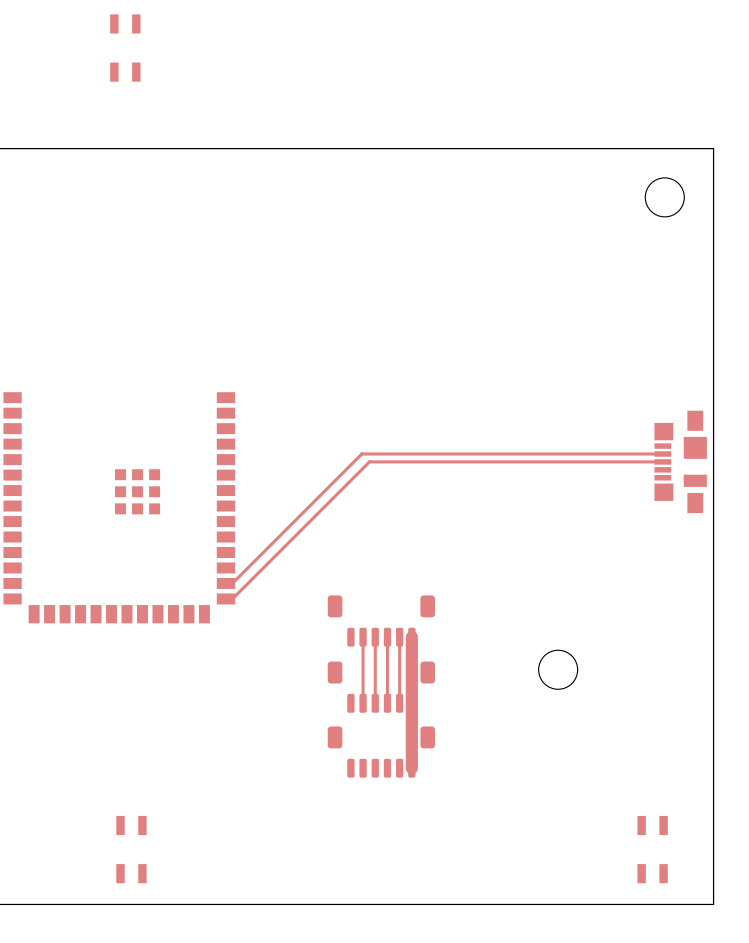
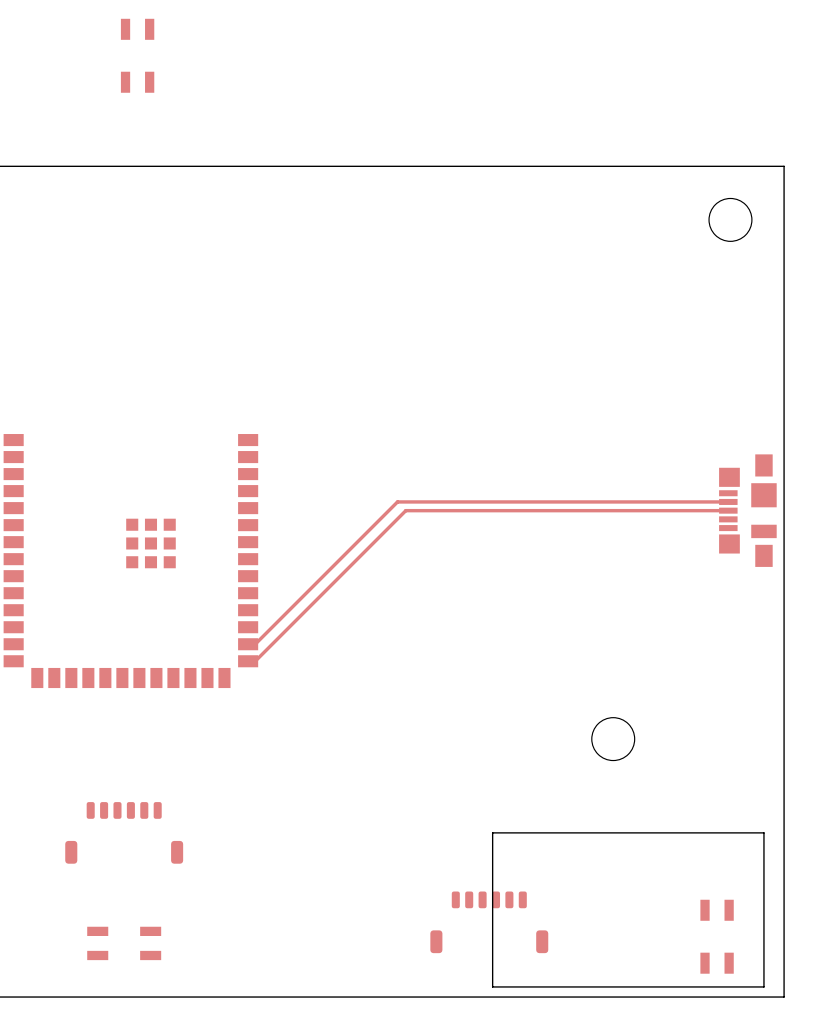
part: (381, 621) -> none
top track: (363, 637) (363, 703) -> none
top track: (375, 637) (375, 703) -> none
top track: (387, 637) (387, 703) -> none
top track: (399, 637) (399, 703) -> none
top track: (411, 637) (411, 768) -> none
part: (381, 687) -> none
part: (381, 752) -> none
part: none -> (124, 832)
board edge: none -> (763, 832) (492, 832) (492, 986) (763, 986) (763, 832)
part: none -> (489, 922)
part rotation: 0° (131, 849) -> 90° clockwise (124, 943)

